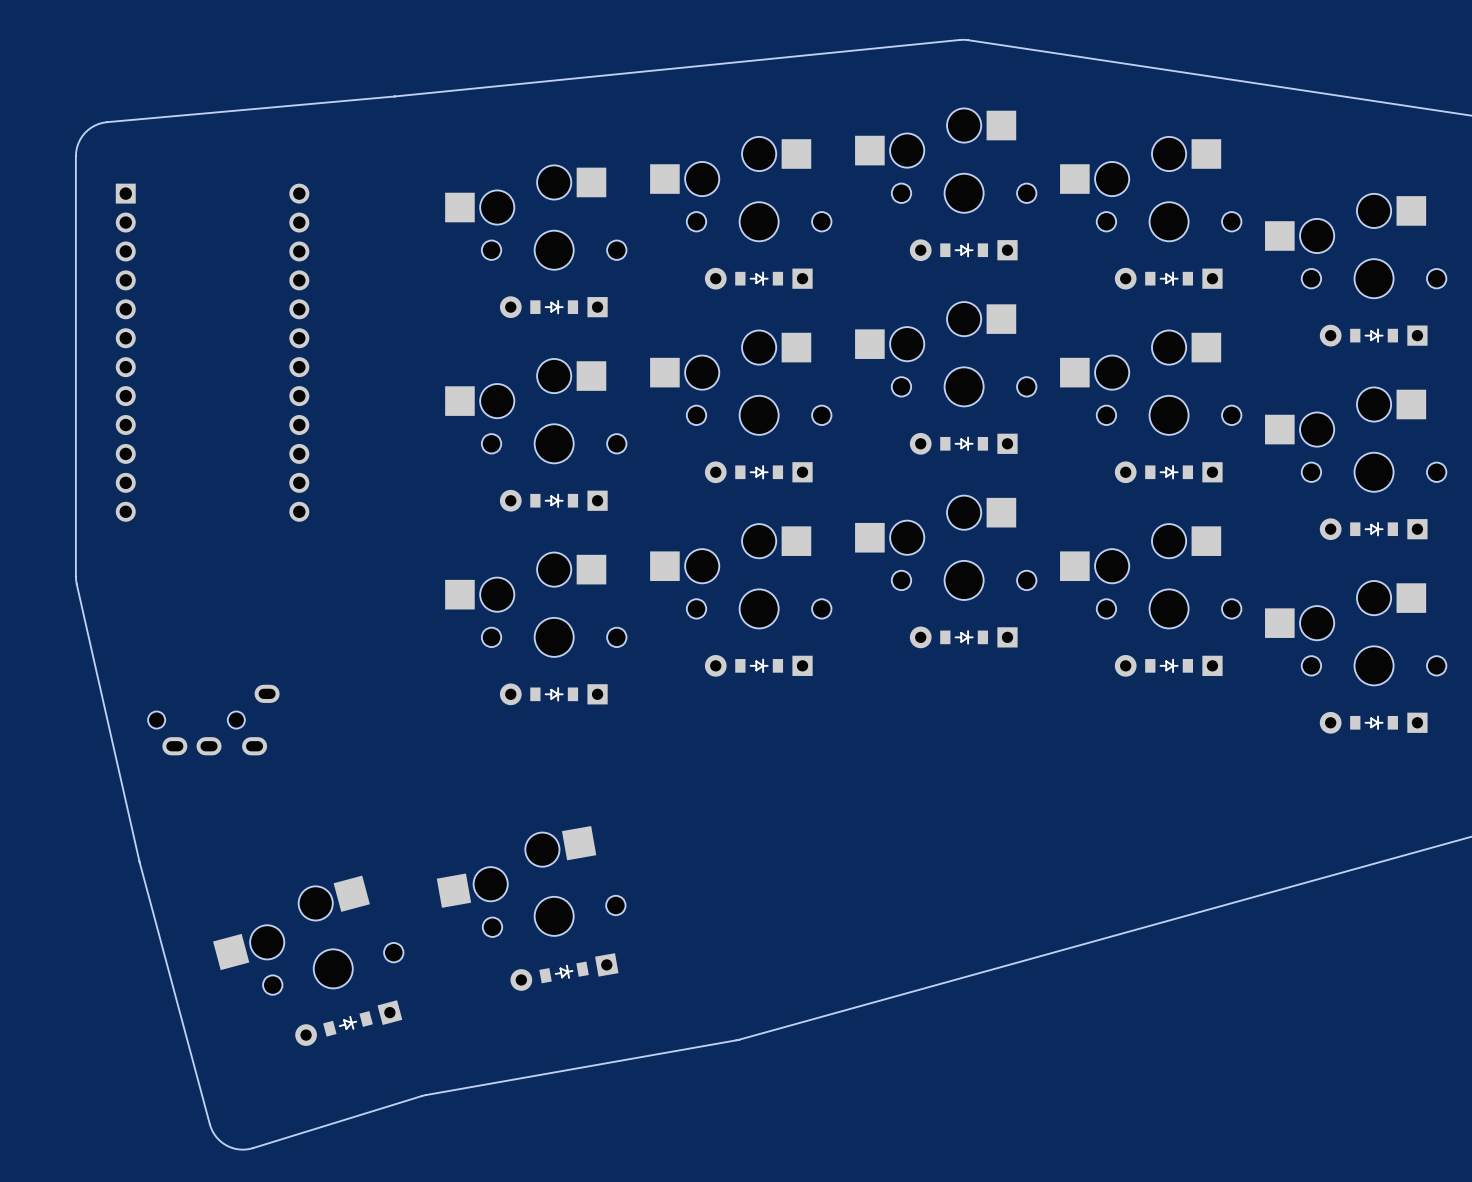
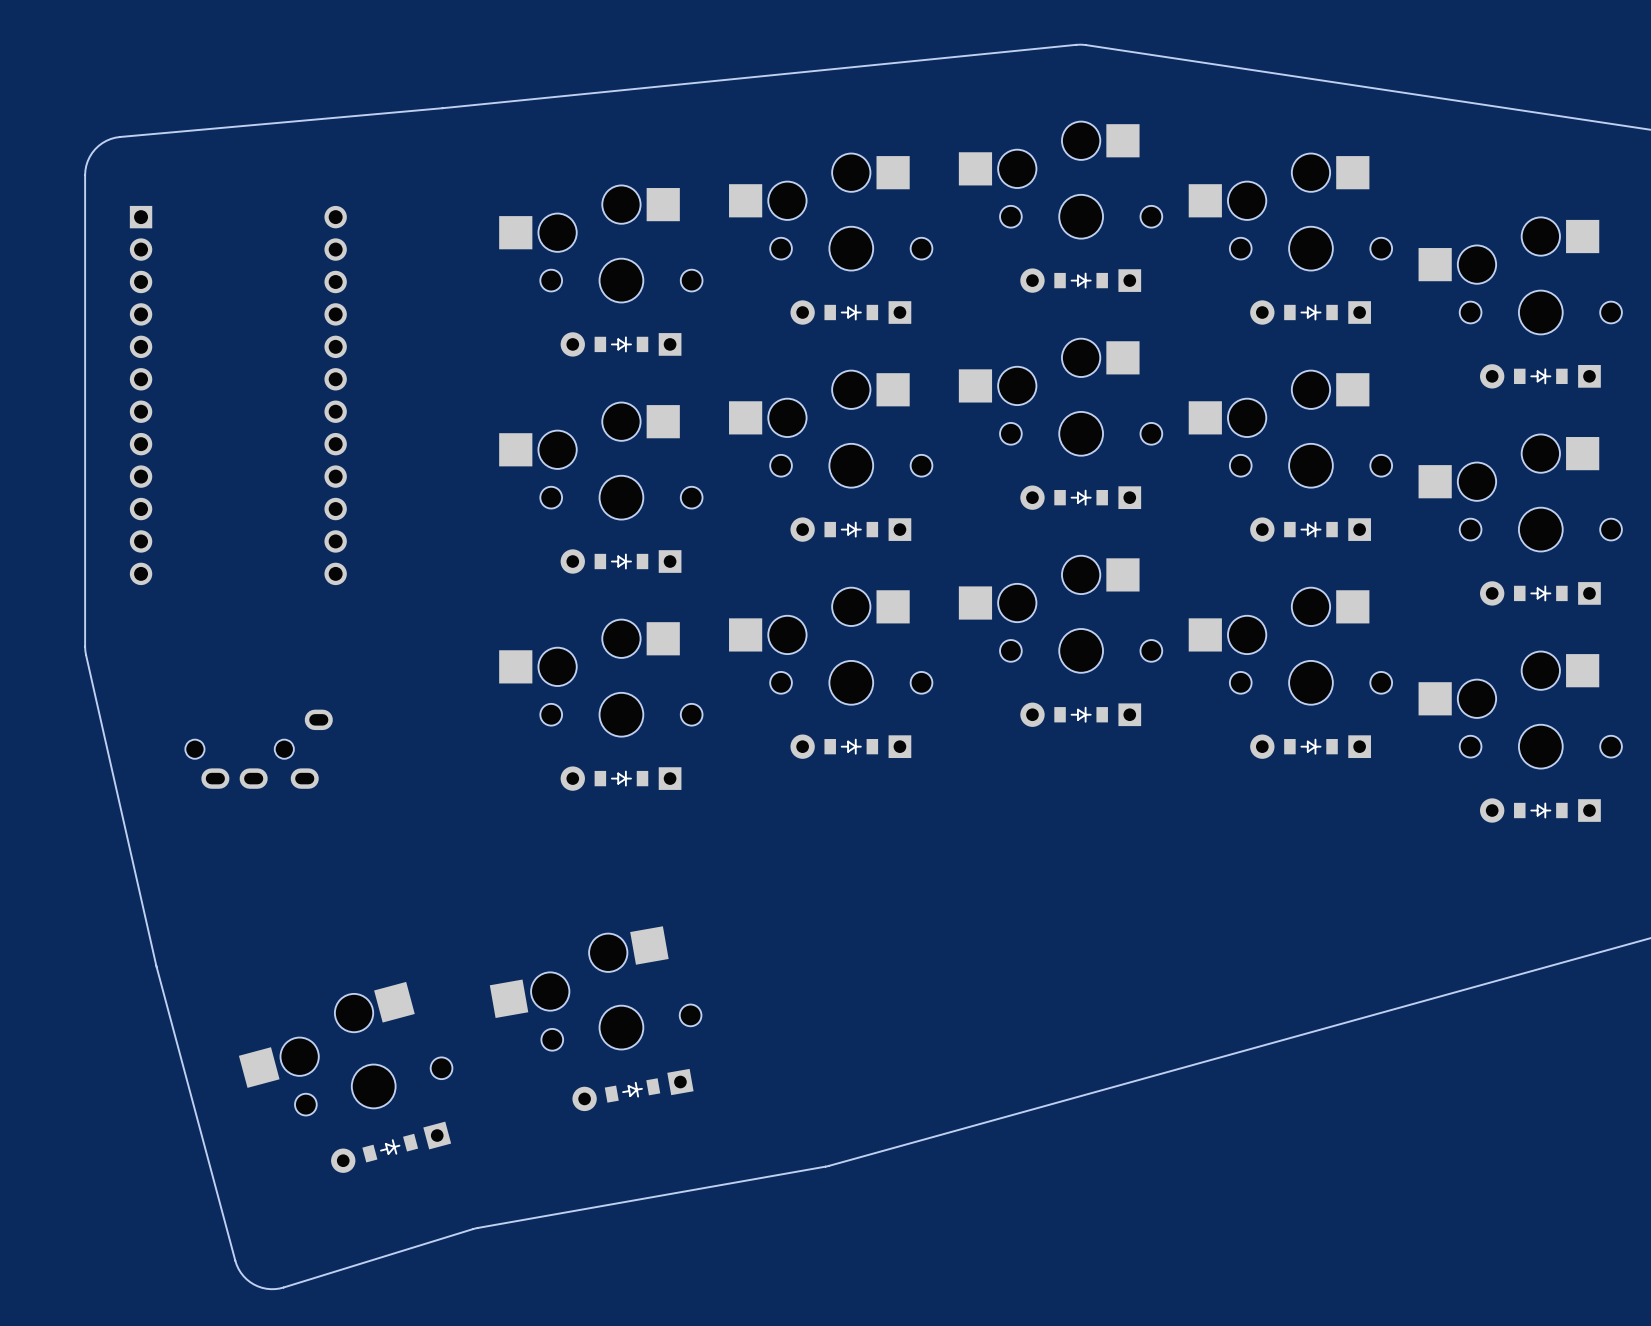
part position: (213, 720) -> (259, 749)

